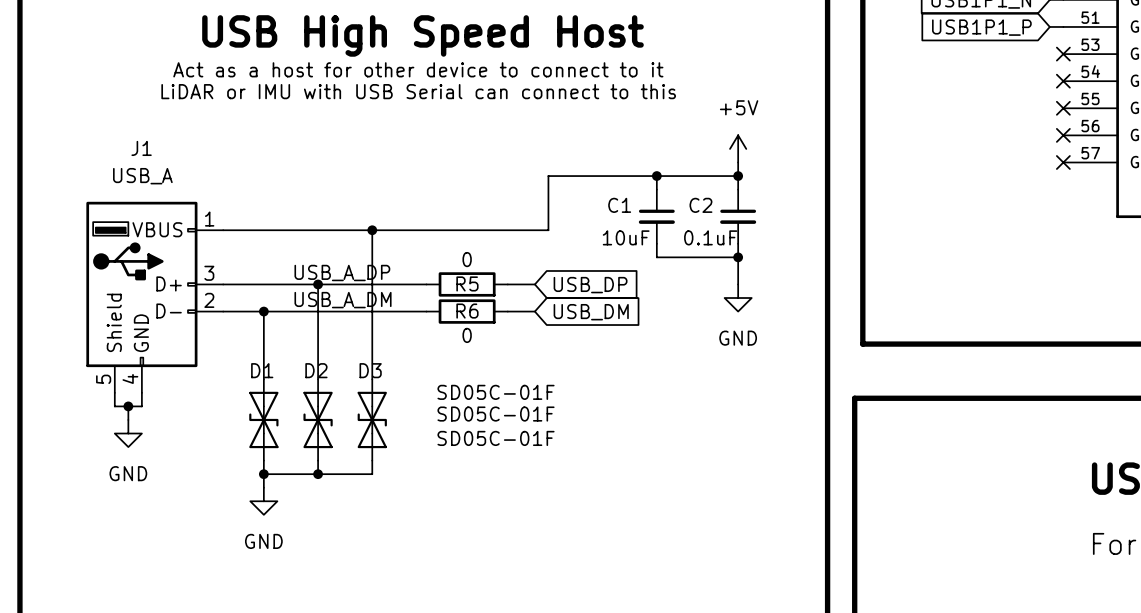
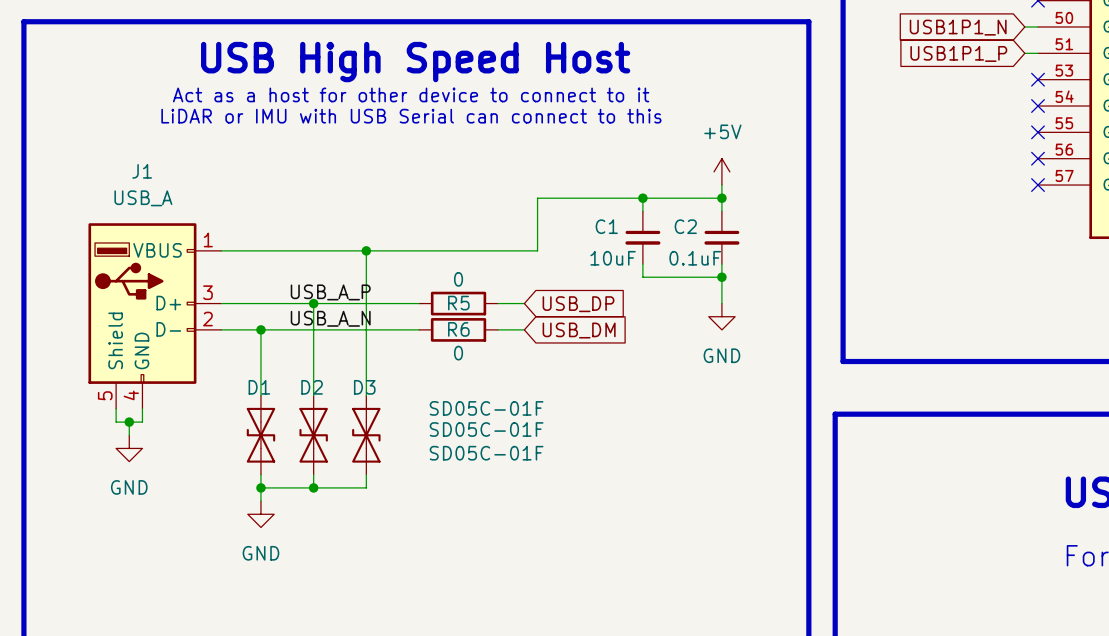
label: USB_A_DP (342, 273) -> USB_A_P (330, 292)
label: USB_A_DM (343, 300) -> USB_A_N (330, 318)

